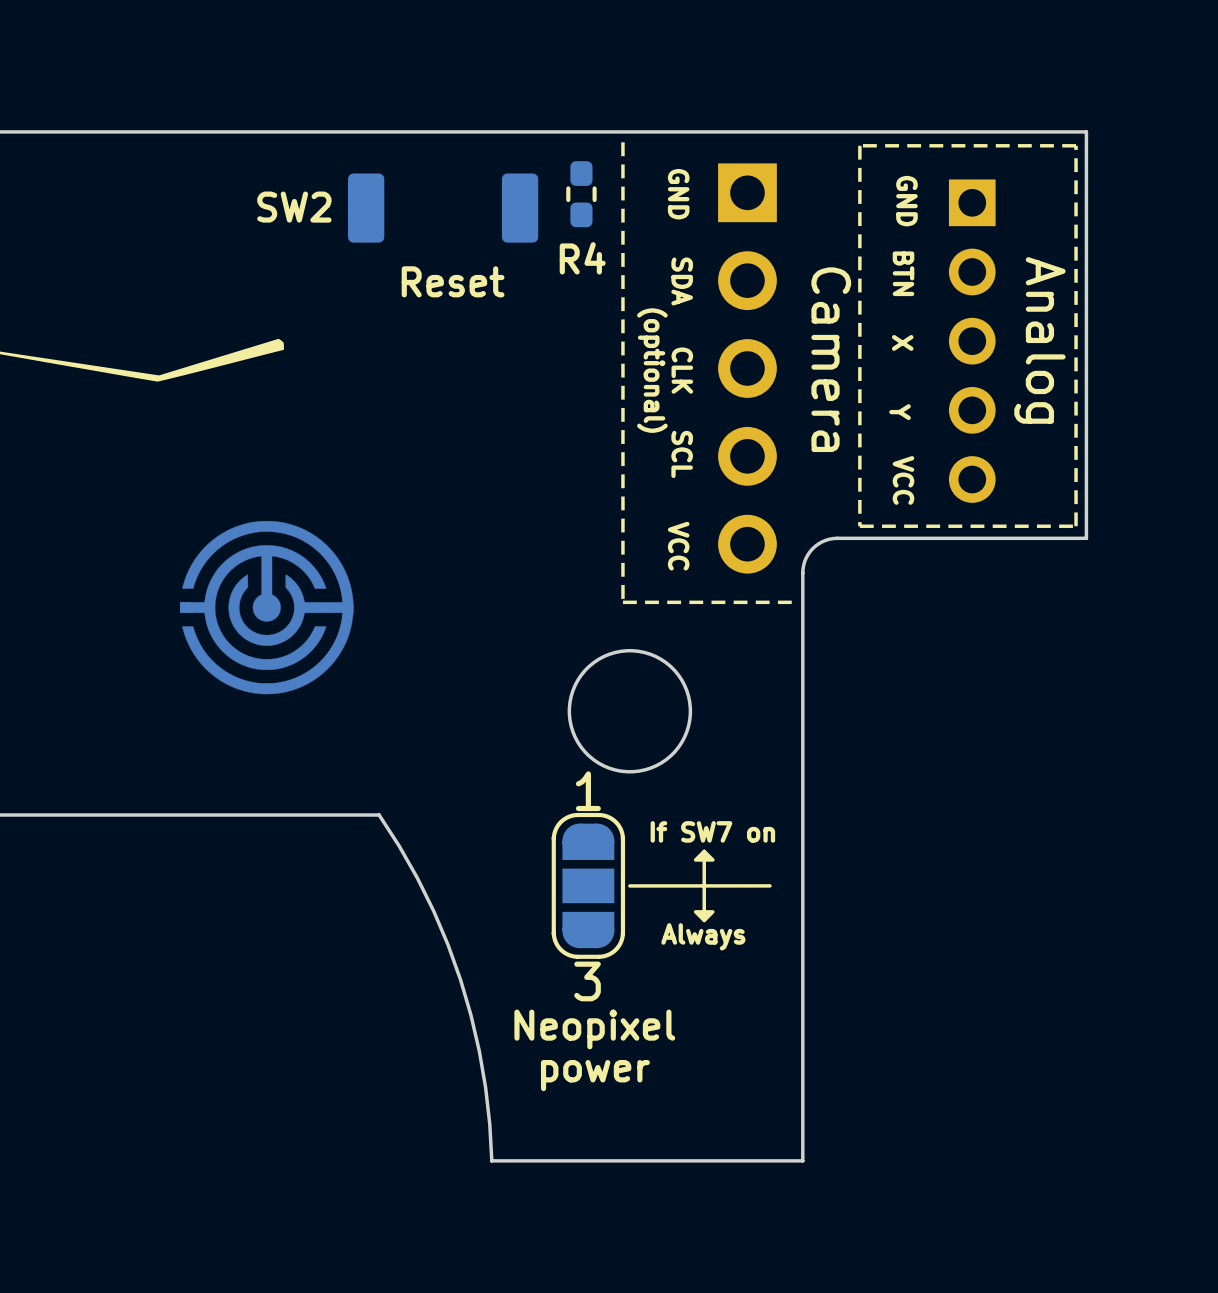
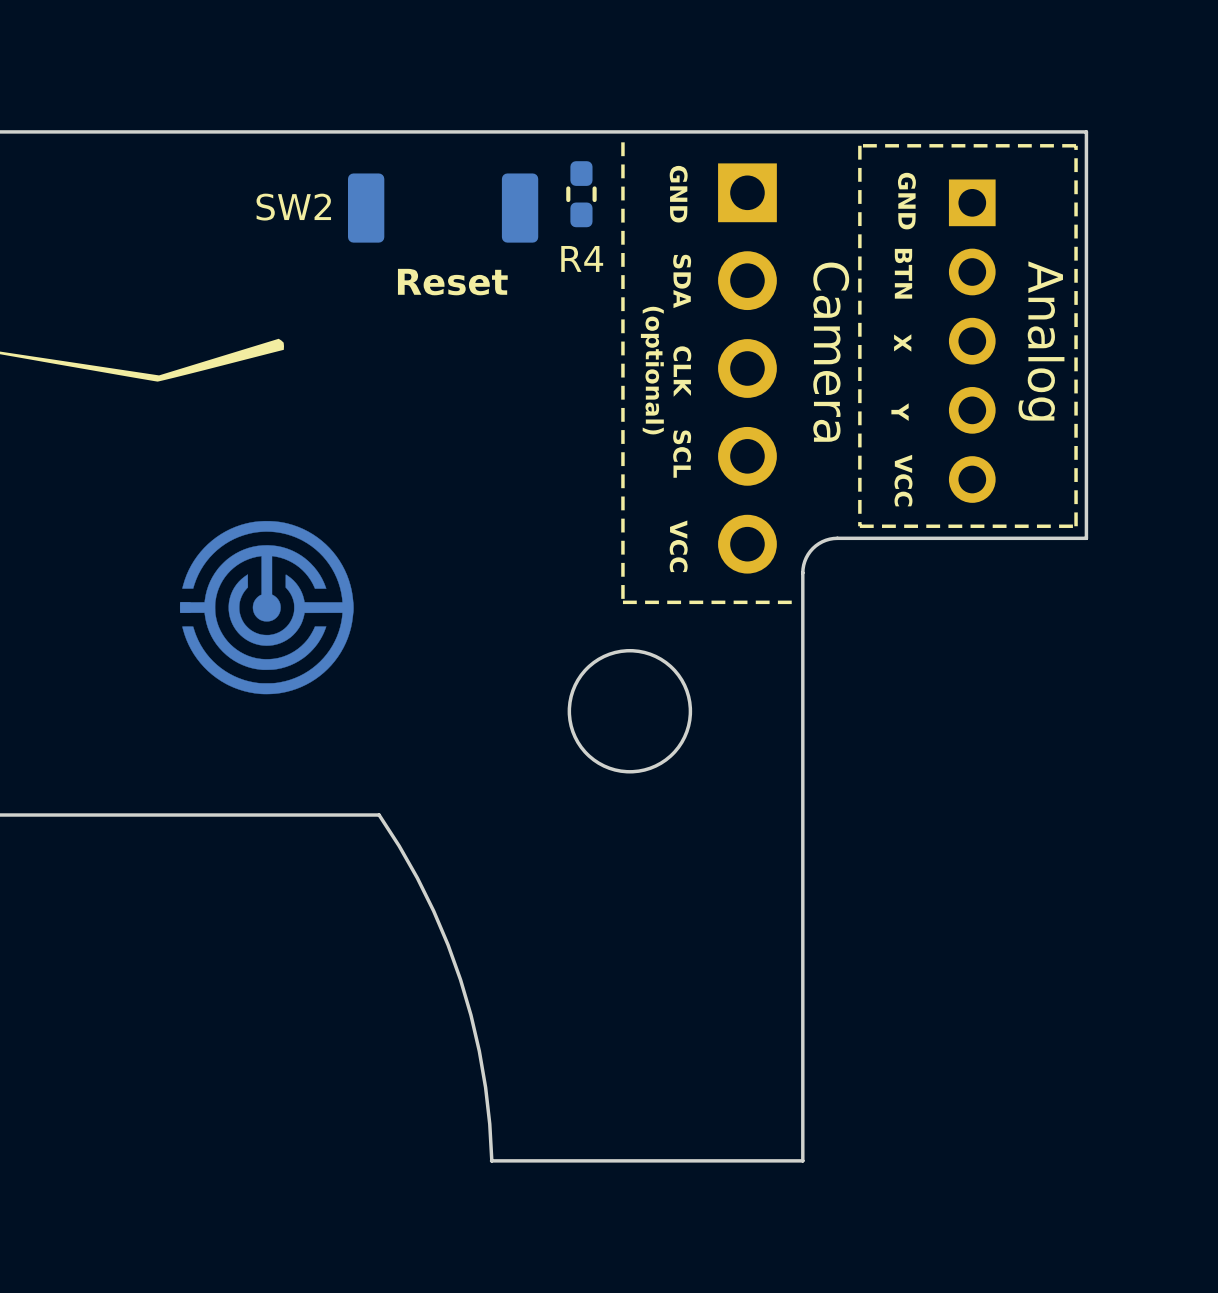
text: If SW7 on (712, 831) -> none
drawing: [693, 849, 715, 862] -> none
line: (704, 851) (704, 920) -> none
part: (588, 885) -> none
line: (769, 885) (629, 885) -> none
drawing: [693, 910, 715, 923] -> none
text: Always (703, 936) -> none
text: Neopixel (594, 1029) -> none
text: power (595, 1075) -> none

